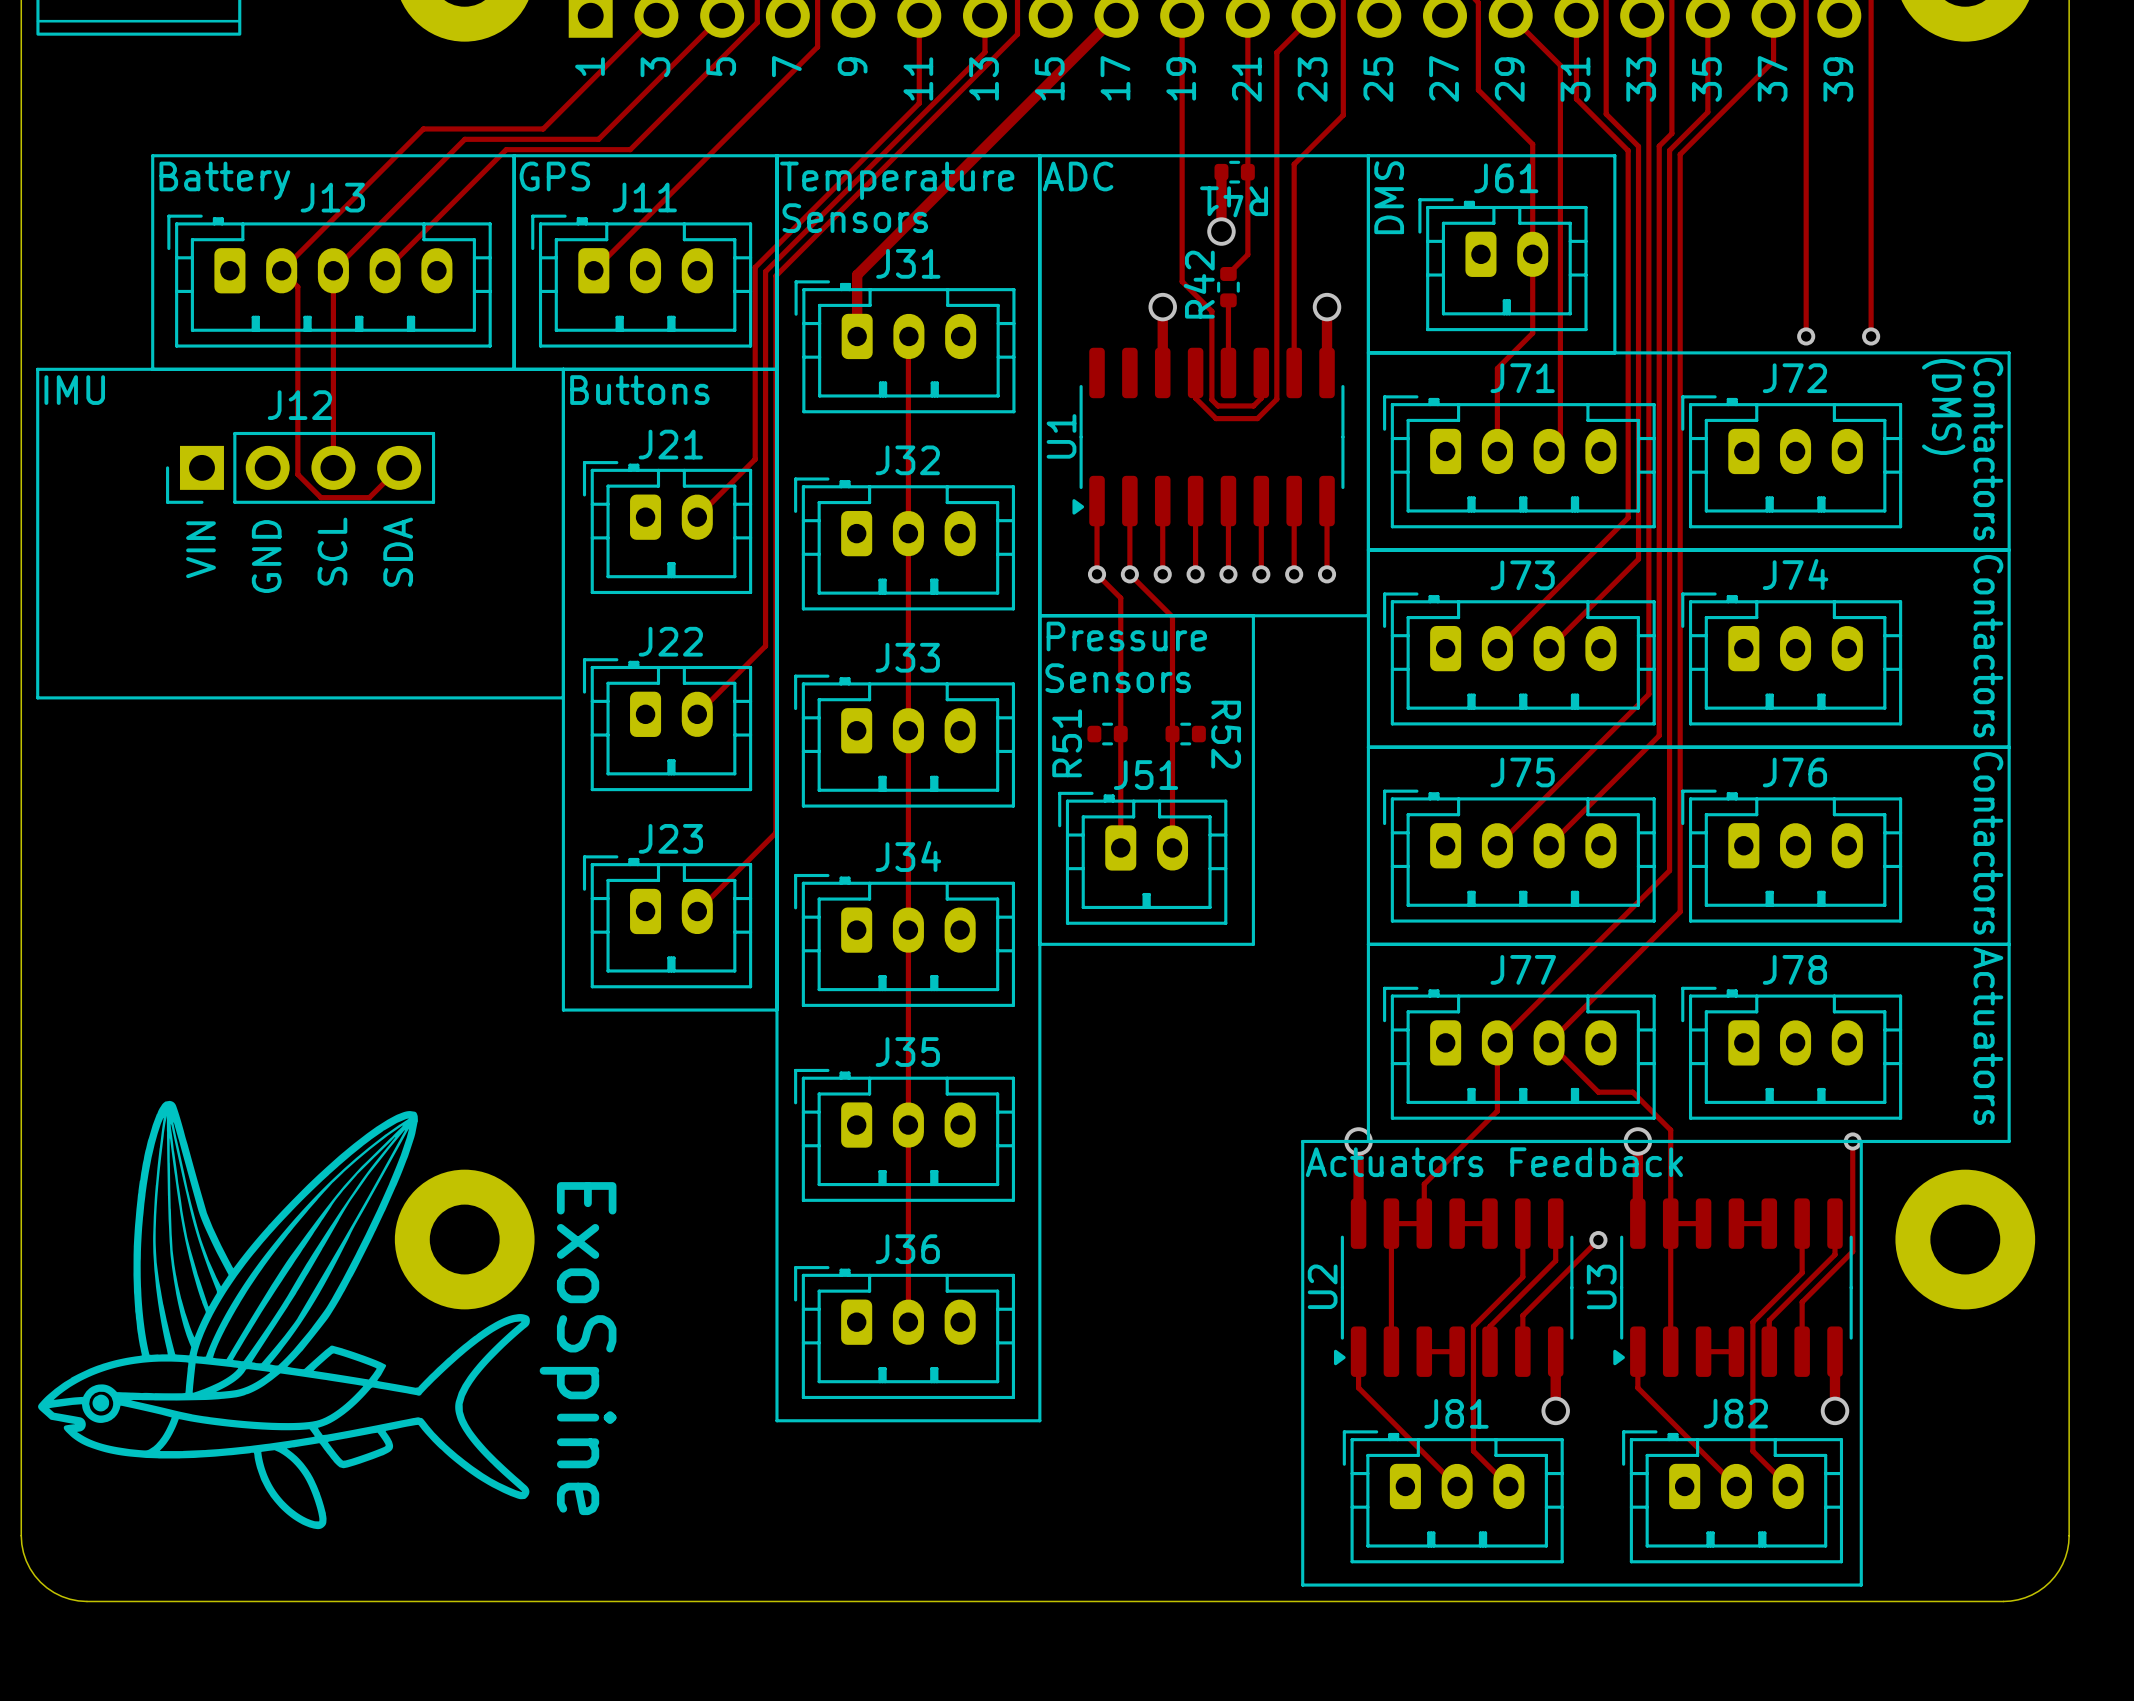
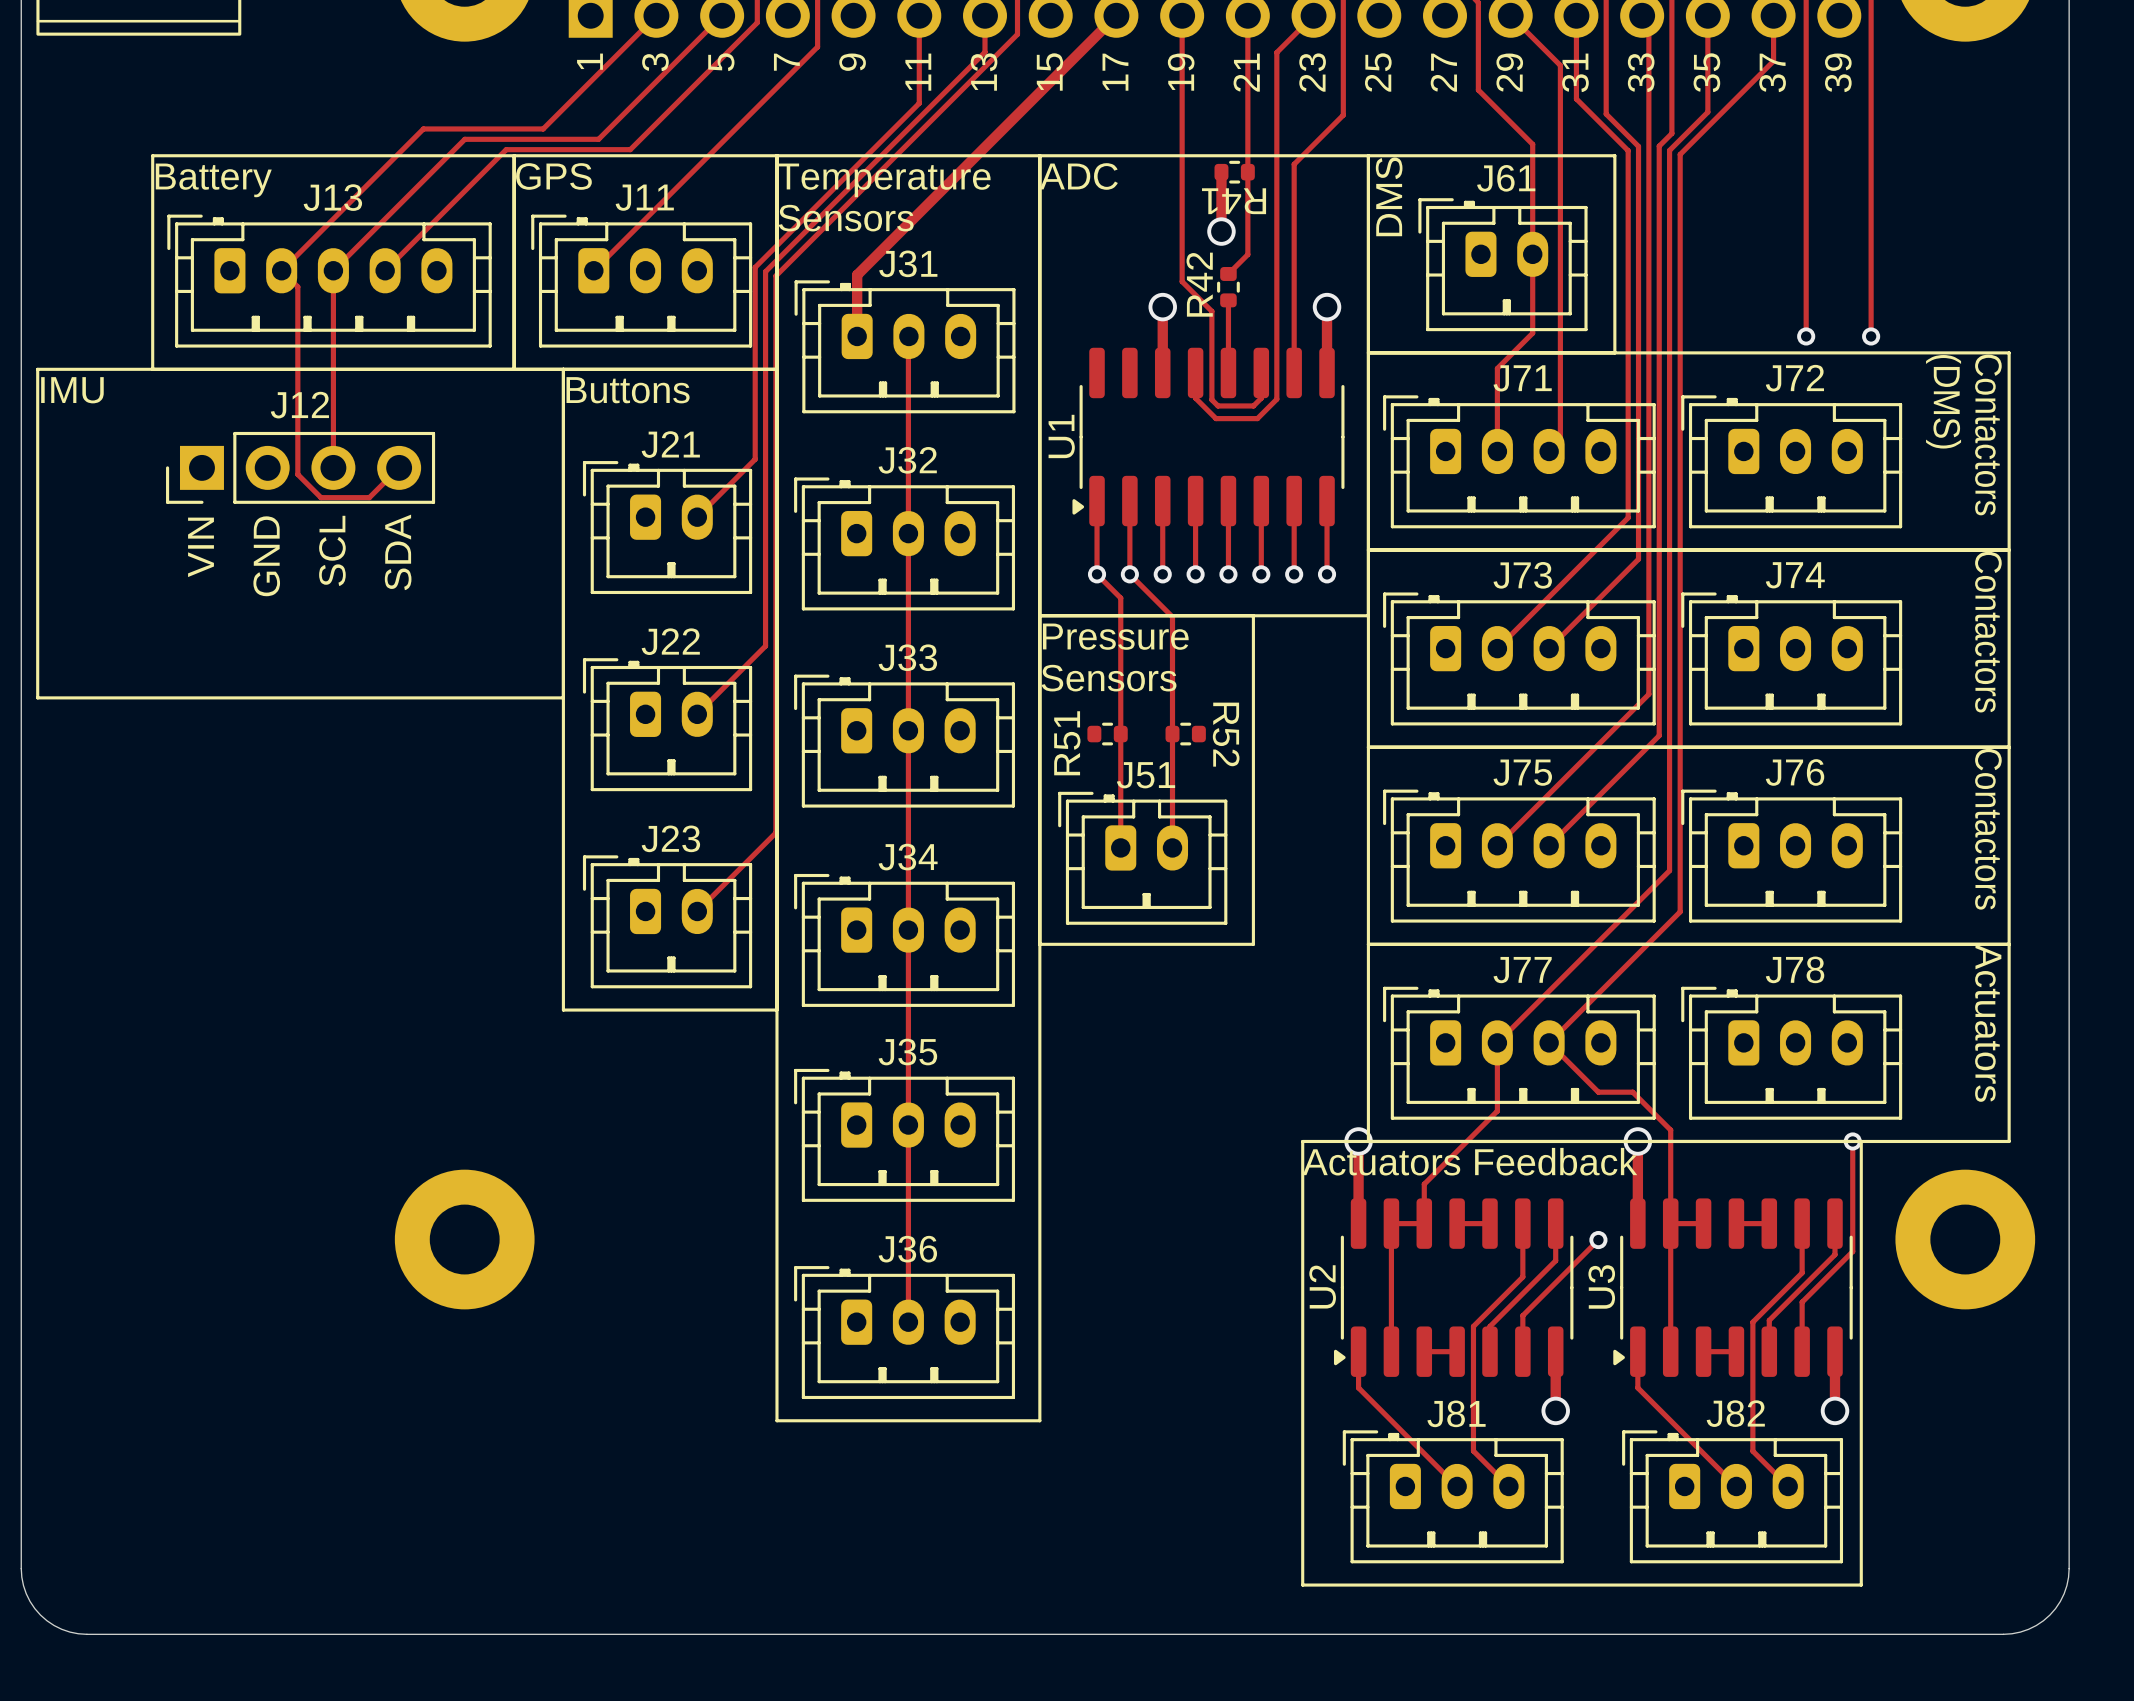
drawing: [38, 1100, 530, 1530] -> none
text: ExoSpine (578, 1348) -> none
board edge: (21, 1535) (26, 1560) (40, 1582) (61, 1596) (86, 1601) (2003, 1601) (2025, 1597) (2038, 1591) (2049, 1582) (2062, 1564) (2067, 1550) (2069, 1535) -> (21, 1535) (21, 1577) (30, 1601) (40, 1615) (54, 1625) (69, 1632) (86, 1634) (2003, 1634) (2020, 1632) (2036, 1625) (2049, 1615) (2060, 1601) (2068, 1577) (2069, 1535)

